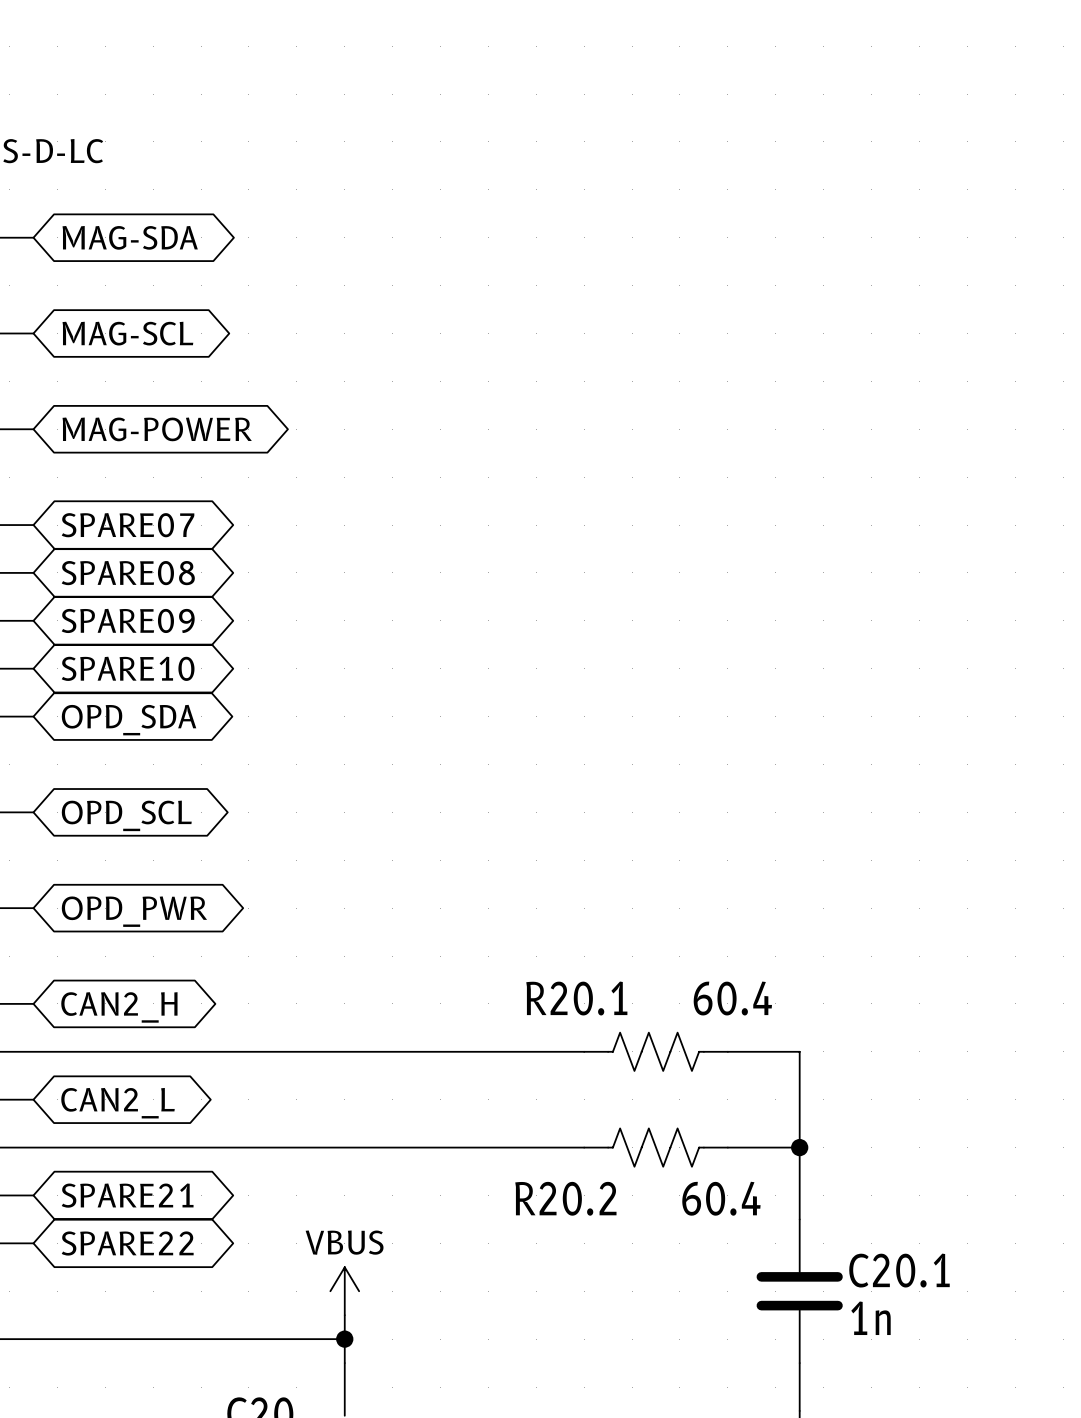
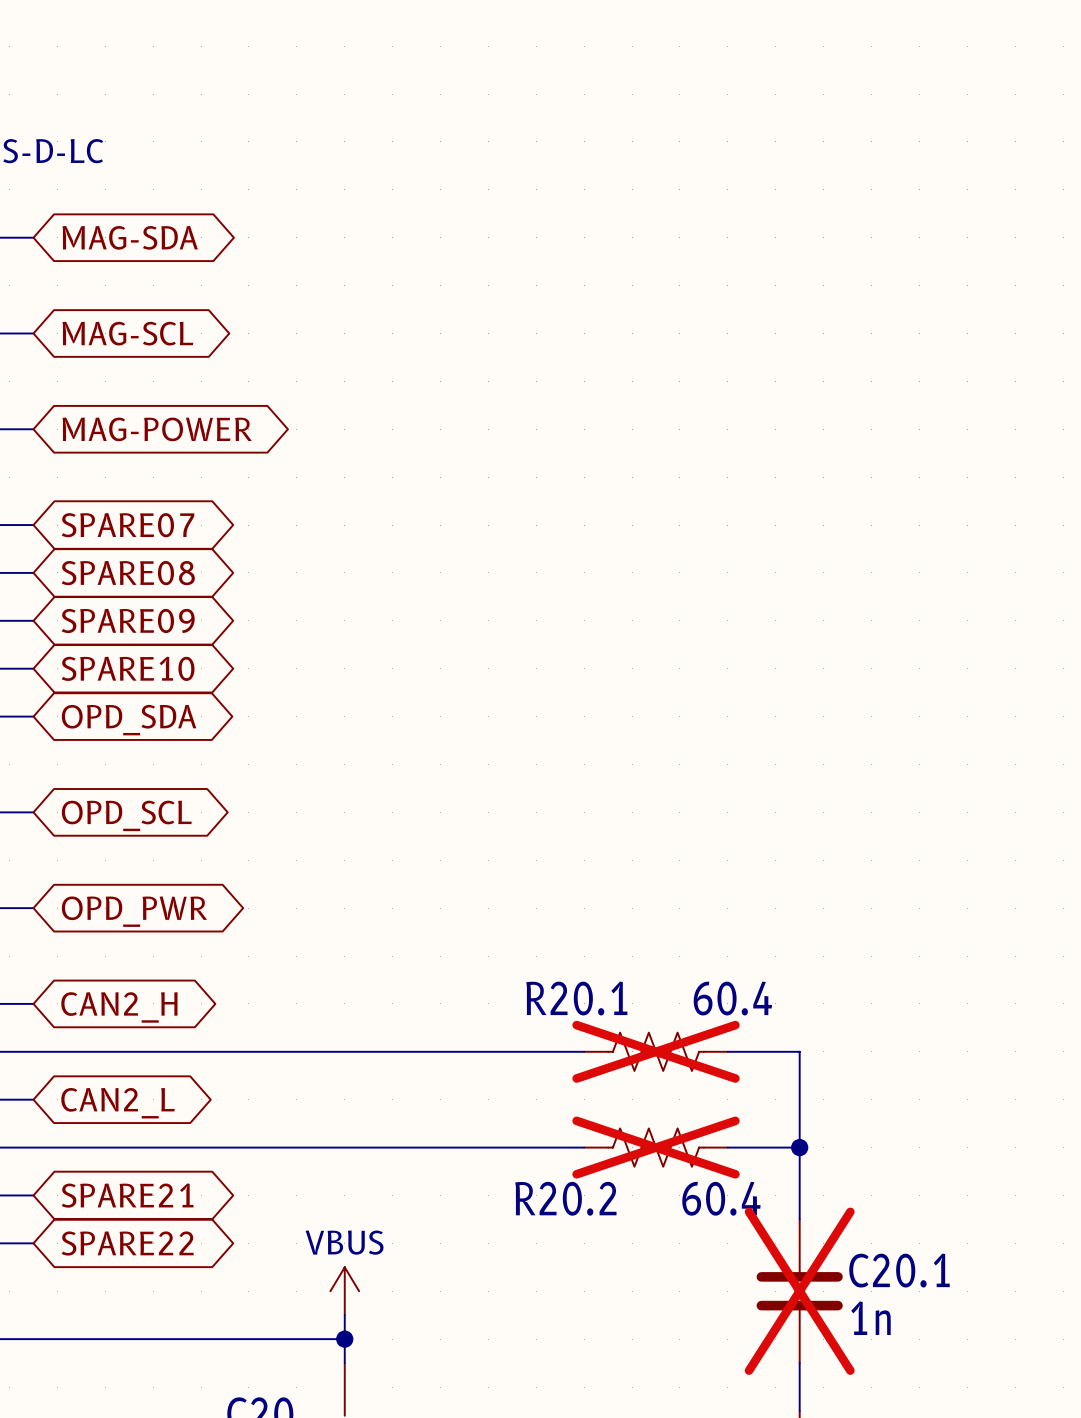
R20.1 do-not-place cross: none -> (656, 1051)
R20.2 do-not-place cross: none -> (656, 1147)
C20.1 do-not-place cross: none -> (799, 1291)

